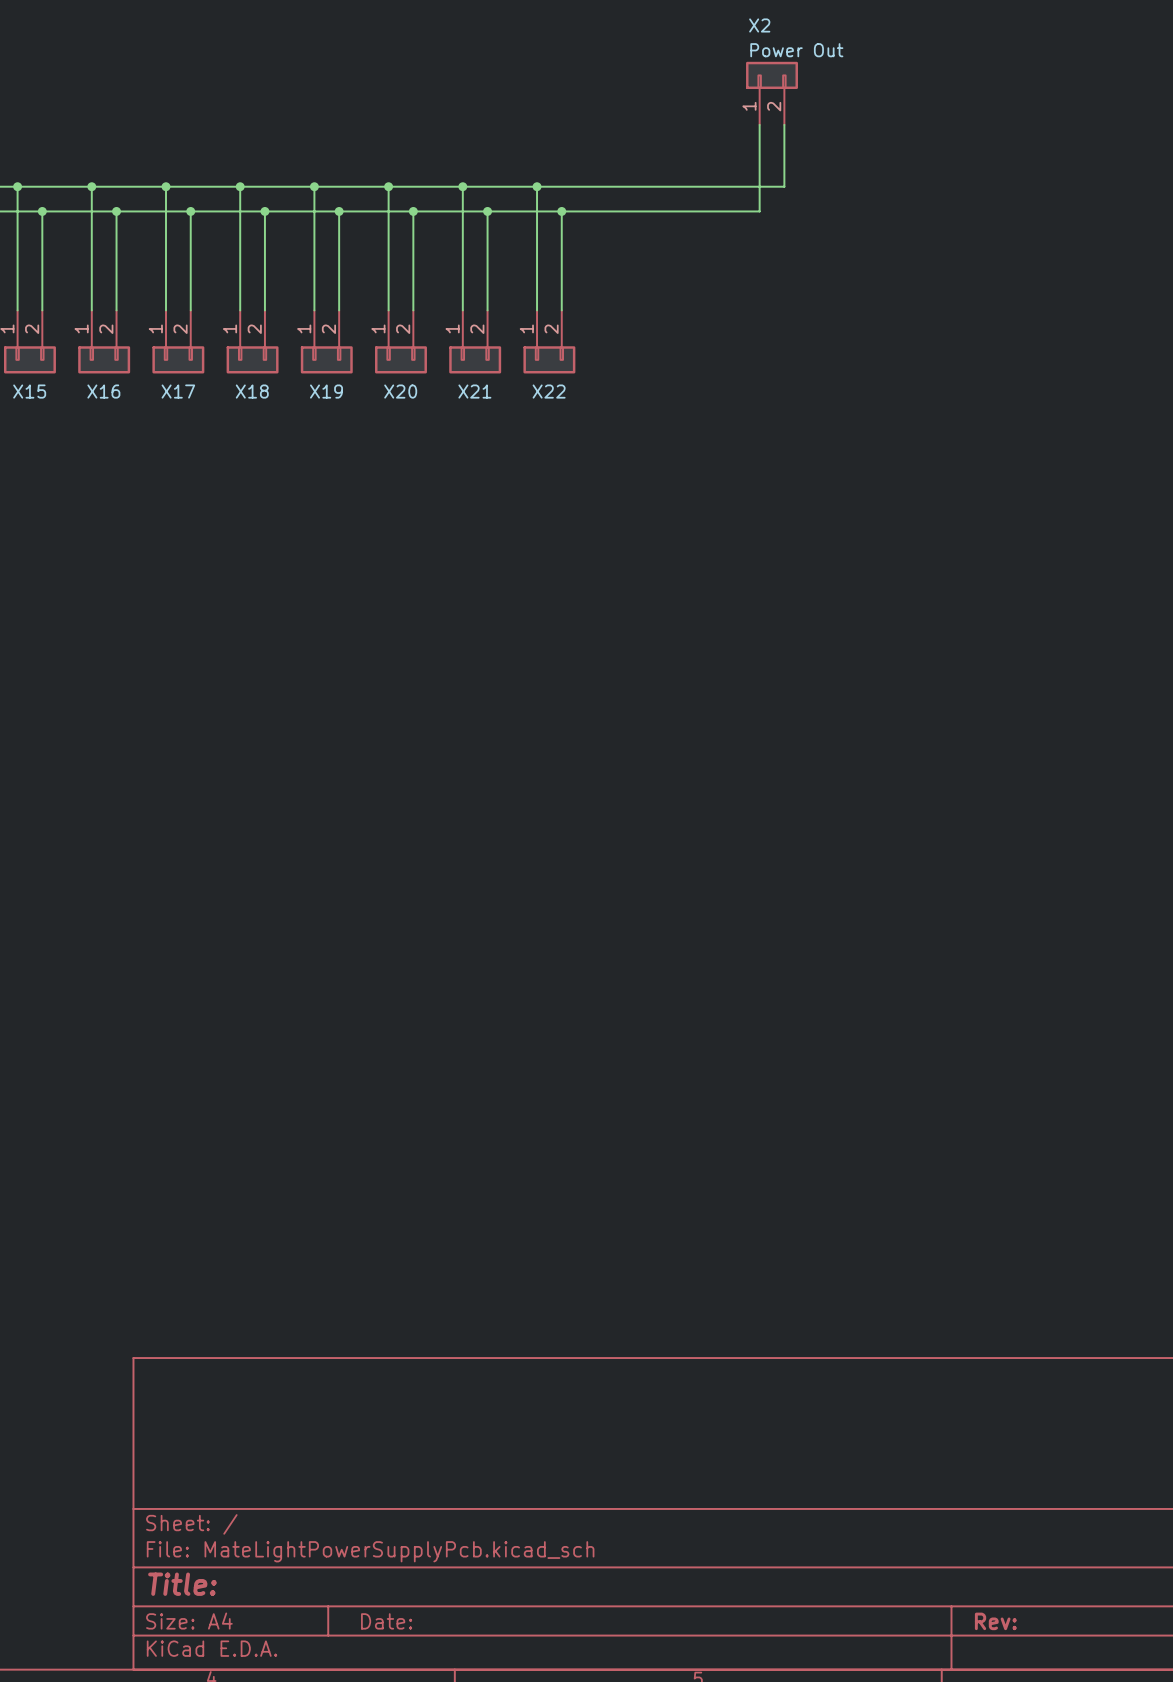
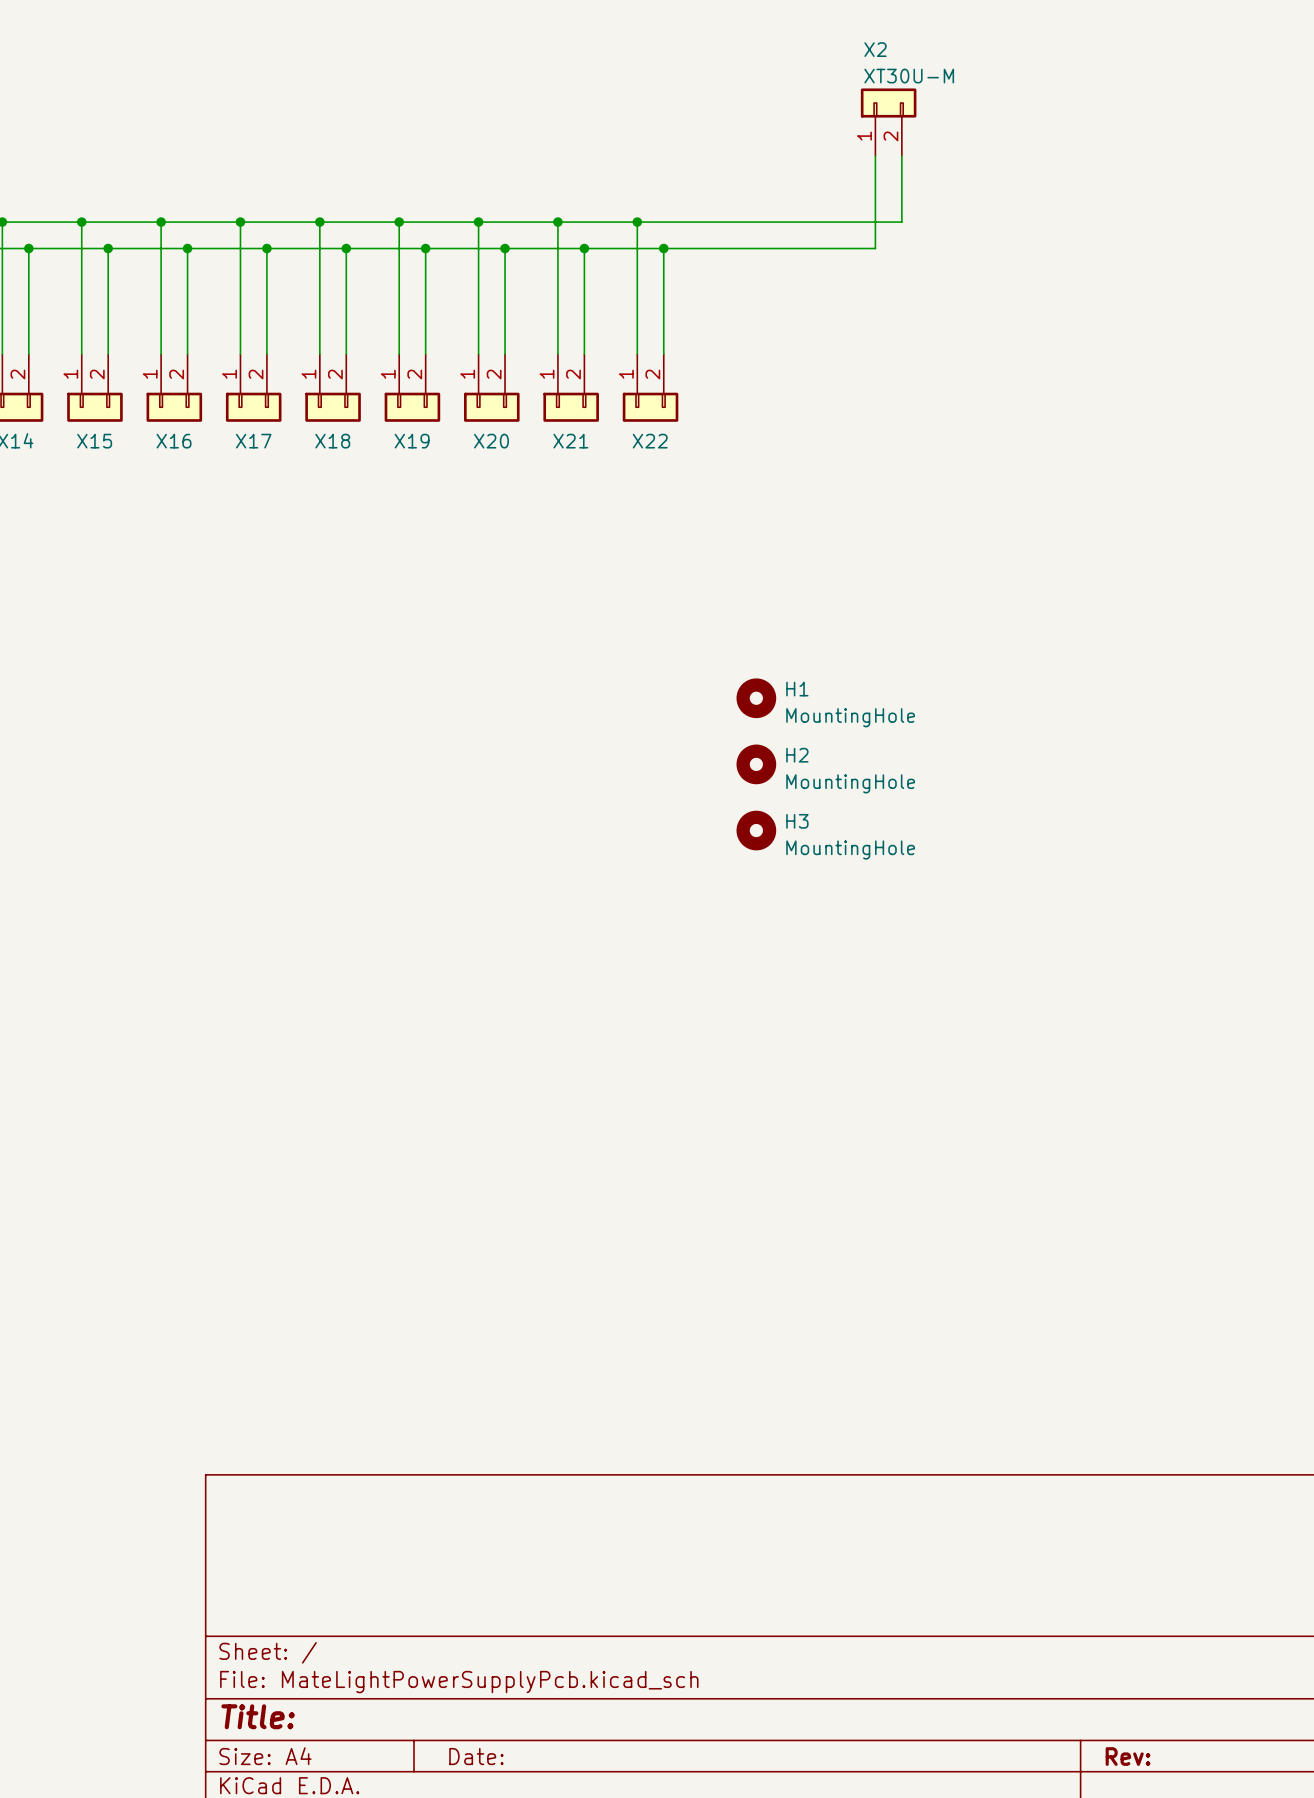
X2 value: Power Out (796, 50) -> XT30U-M (909, 76)
H1: none -> MountingHole (756, 698)
H2: none -> MountingHole (756, 764)
H3: none -> MountingHole (756, 830)

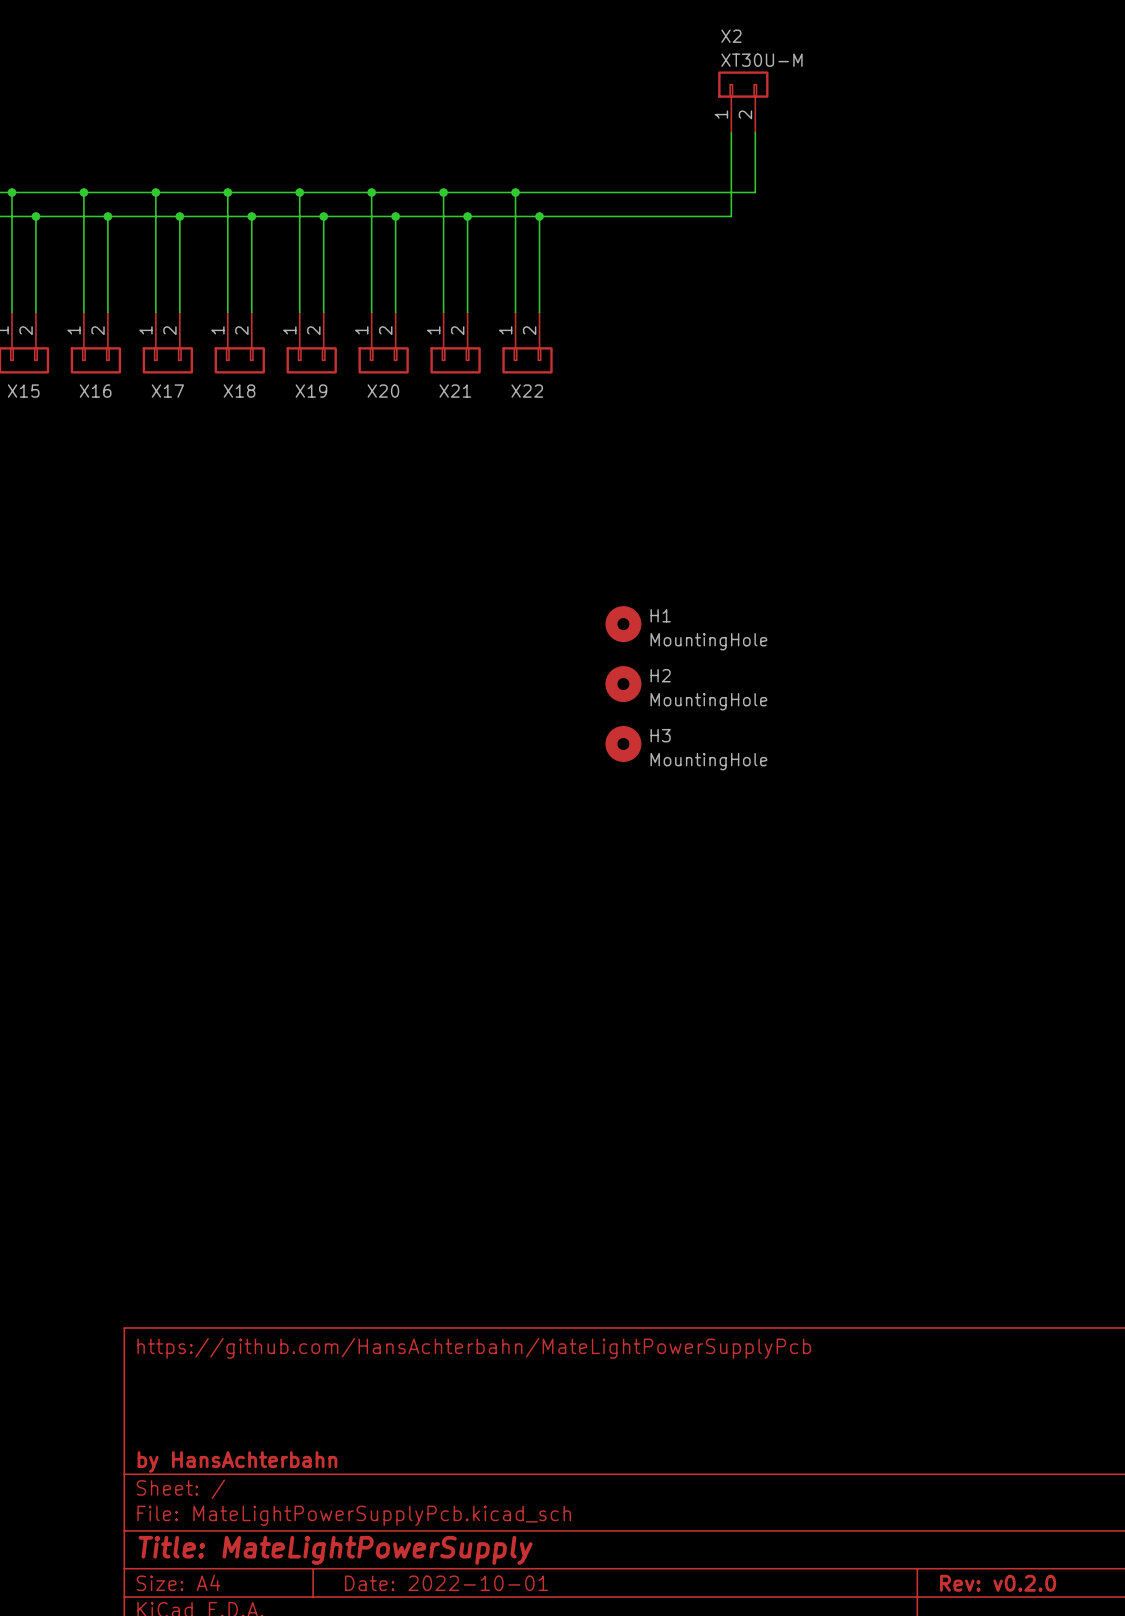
title block: none -> https://github.com/HansAchterbahn/MateLightPowerSupplyPcb (474, 1348)
title block: none -> by HansAchterbahn (237, 1461)
title block: Title: (258, 1716) -> Title: MateLightPowerSupply (335, 1550)
title block: Date: (476, 1756) -> Date: 2022-10-01 (446, 1583)
title block: Rev: (1128, 1756) -> Rev: v0.2.0 (998, 1583)

